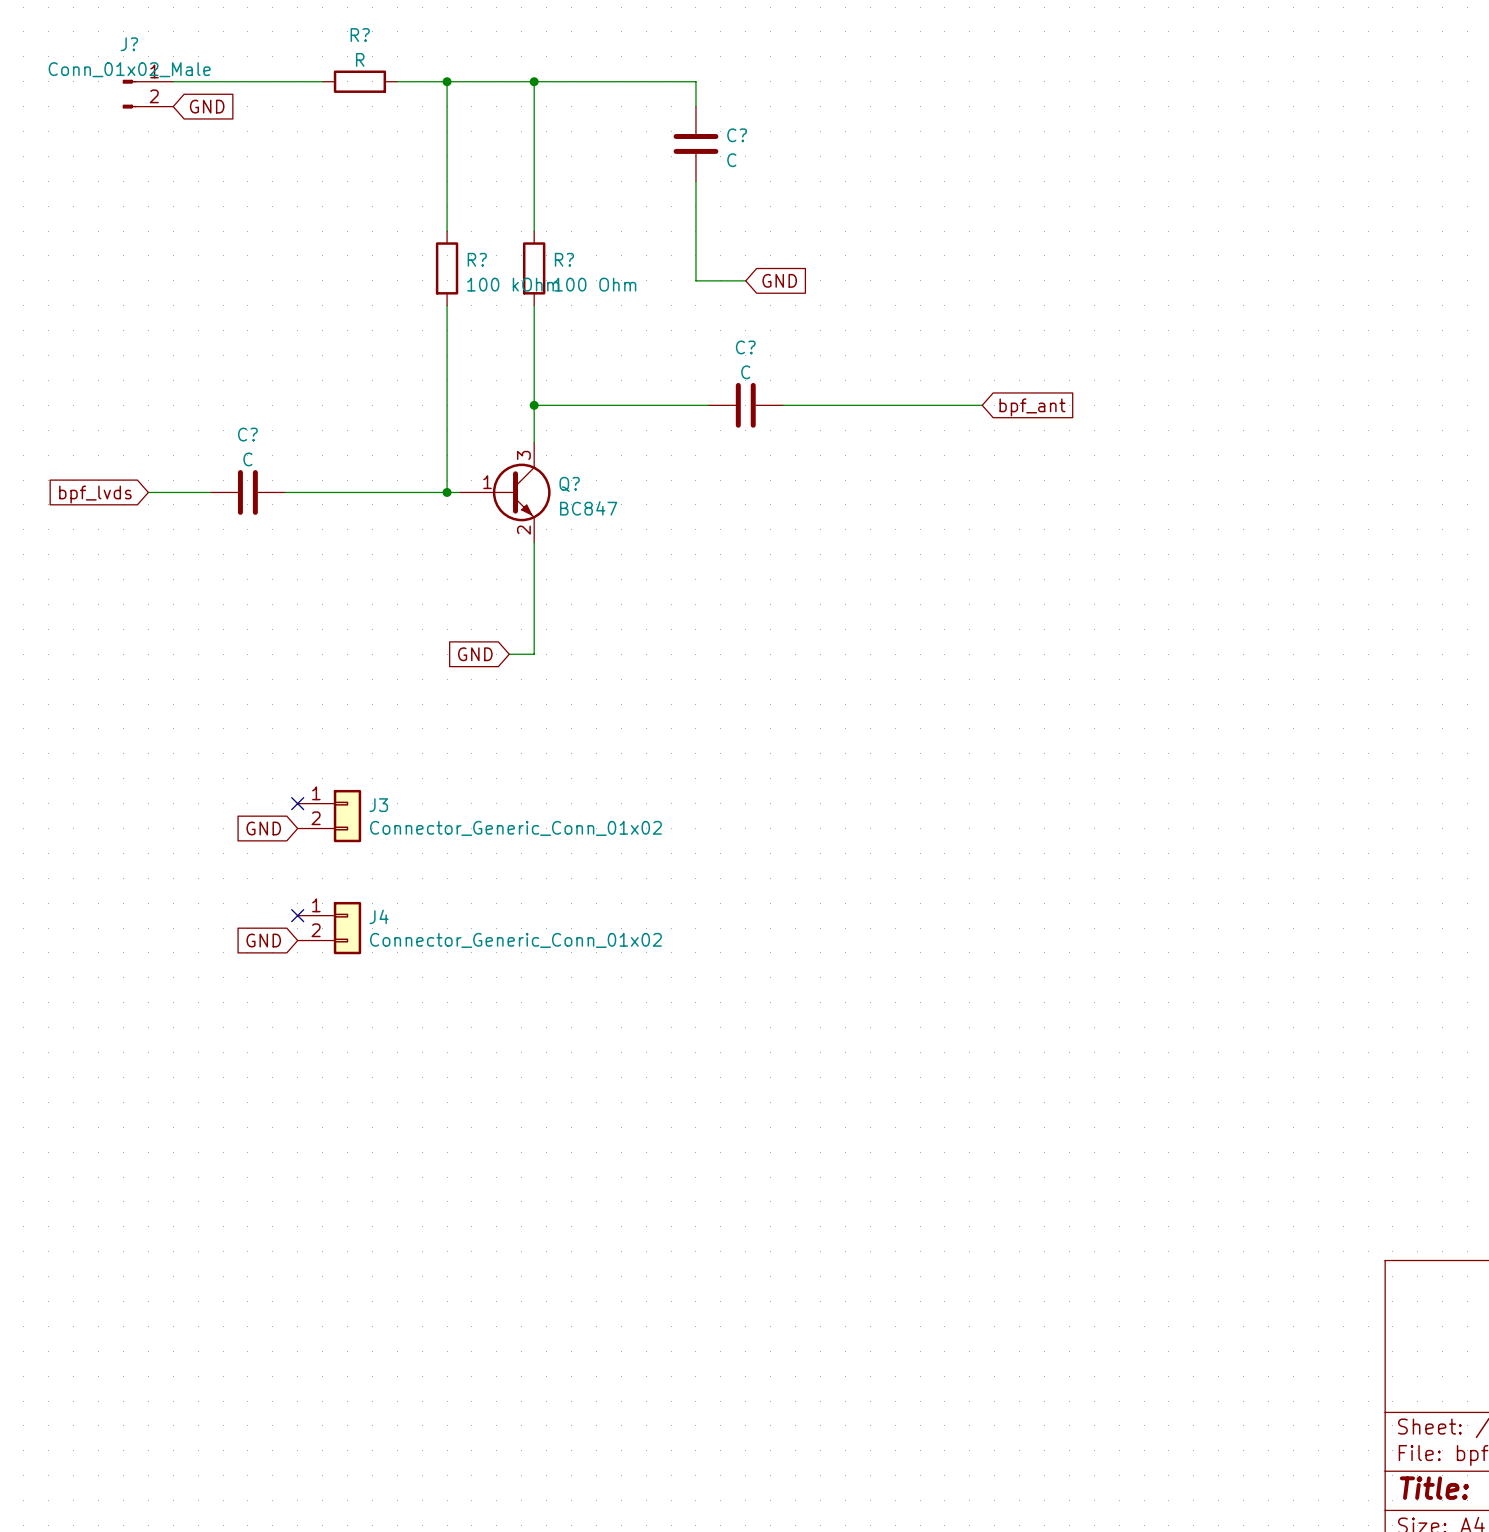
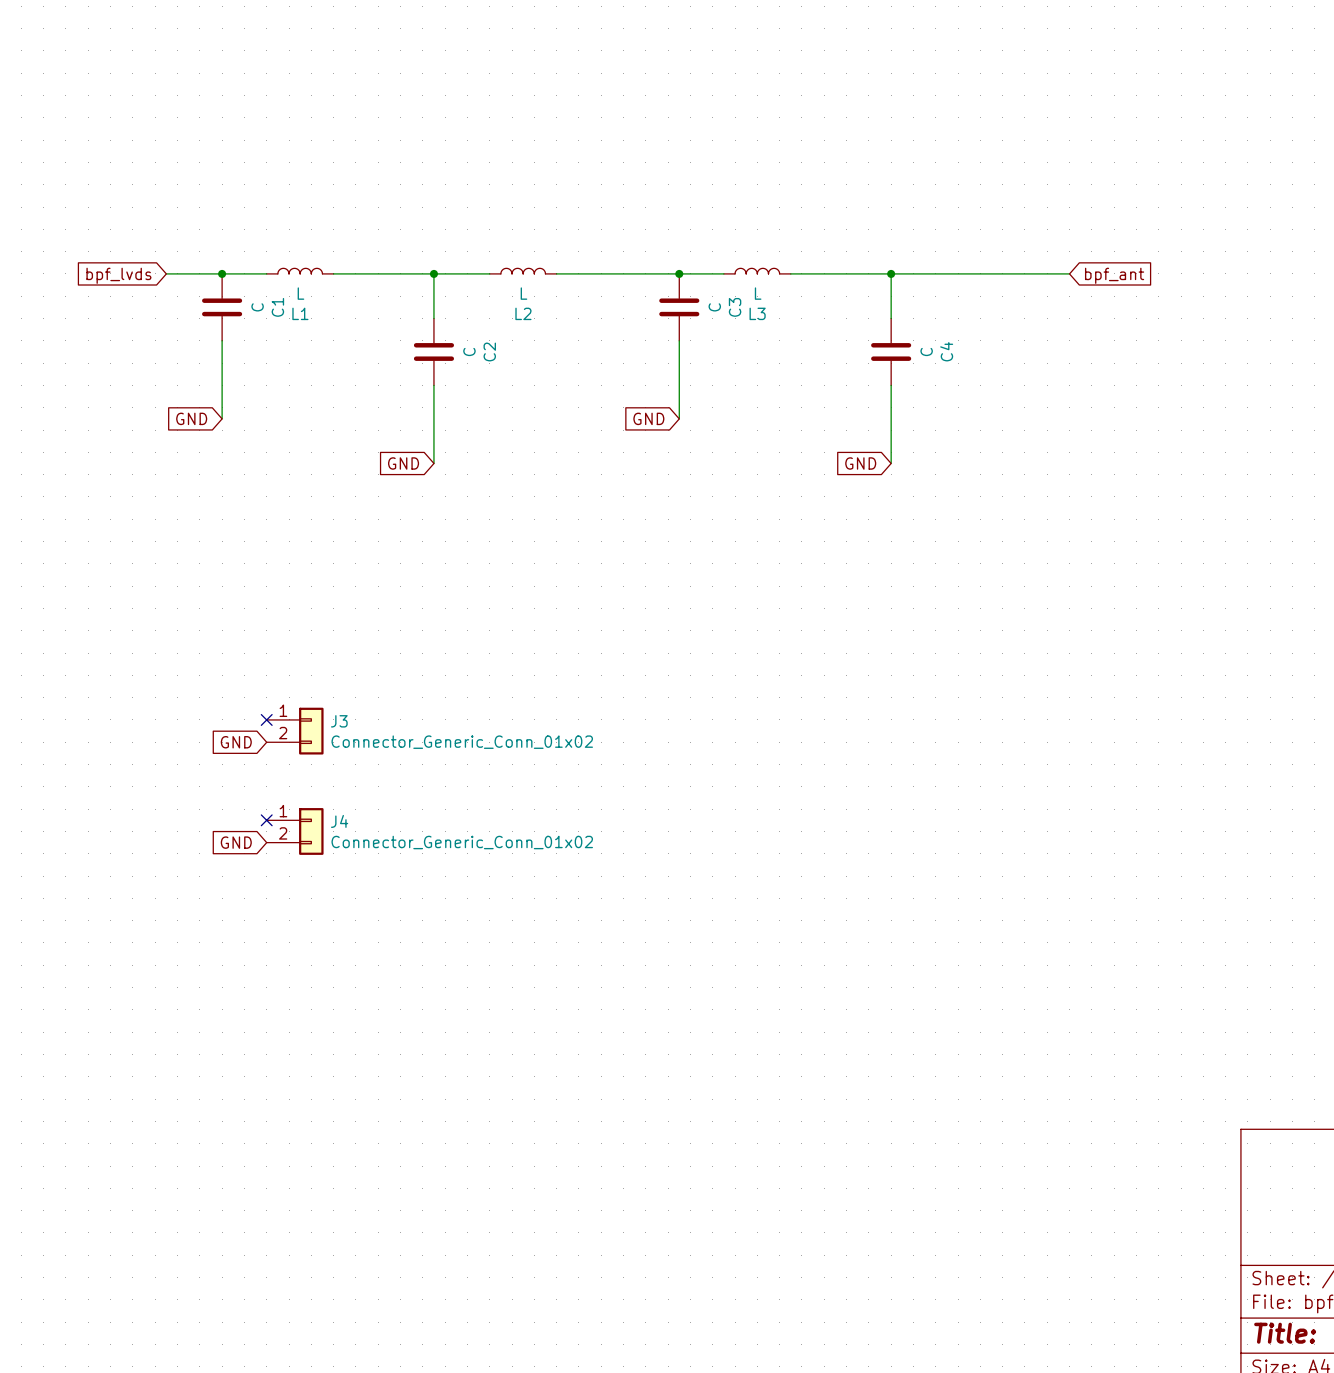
wire: (173, 81) (322, 81) -> none
R?: R (359, 81) -> none
wire: (397, 81) (695, 81) (695, 106) -> none
wire: (447, 81) (447, 231) -> none
junction: (447, 81) -> none
wire: (534, 81) (534, 231) -> none
junction: (534, 81) -> none
J?: Conn_01x02_Male (147, 94) -> none
global label: GND (207, 106) -> none
C?: C (695, 143) -> none
wire: (695, 181) (695, 280) (745, 280) -> none
R?: 100 kOhm (447, 268) -> none
R?: 100 Ohm (534, 268) -> none
global label: GND (779, 280) -> none
L1: none -> L (300, 271)
L2: none -> L (523, 271)
L3: none -> L (757, 271)
wire: none -> (166, 273) (266, 273)
junction: none -> (222, 273)
wire: (447, 305) (447, 492) -> none
wire: none -> (433, 273) (433, 318)
junction: none -> (433, 273)
wire: (534, 305) (534, 442) -> none
wire: none -> (556, 273) (723, 273)
junction: none -> (679, 273)
wire: none -> (790, 273) (1069, 273)
wire: none -> (891, 273) (891, 318)
junction: none -> (891, 273)
C1: none -> C (222, 307)
C3: none -> C (679, 307)
wire: none -> (222, 340) (222, 418)
wire: none -> (679, 340) (679, 418)
C2: none -> C (433, 351)
C4: none -> C (891, 351)
wire: (534, 405) (708, 405) -> (333, 273) (489, 273)
junction: (534, 405) -> none
C?: C (745, 405) -> none
wire: (783, 405) (982, 405) -> none
global label position: bpf_ant (1032, 407) -> bpf_ant (1114, 275)
wire: none -> (433, 385) (433, 463)
wire: none -> (891, 385) (891, 463)
global label: none -> GND (191, 418)
global label: none -> GND (648, 418)
wire: (148, 492) (210, 492) -> none
C?: C (247, 492) -> none
wire: (285, 492) (459, 492) -> none
junction: (447, 492) -> none
Q?: BC847 (505, 492) -> none
global label position: bpf_lvds (95, 494) -> bpf_lvds (118, 275)
global label: none -> GND (860, 463)
wire: (534, 542) (534, 654) (509, 654) -> none
global label position: GND (475, 654) -> GND (403, 463)

